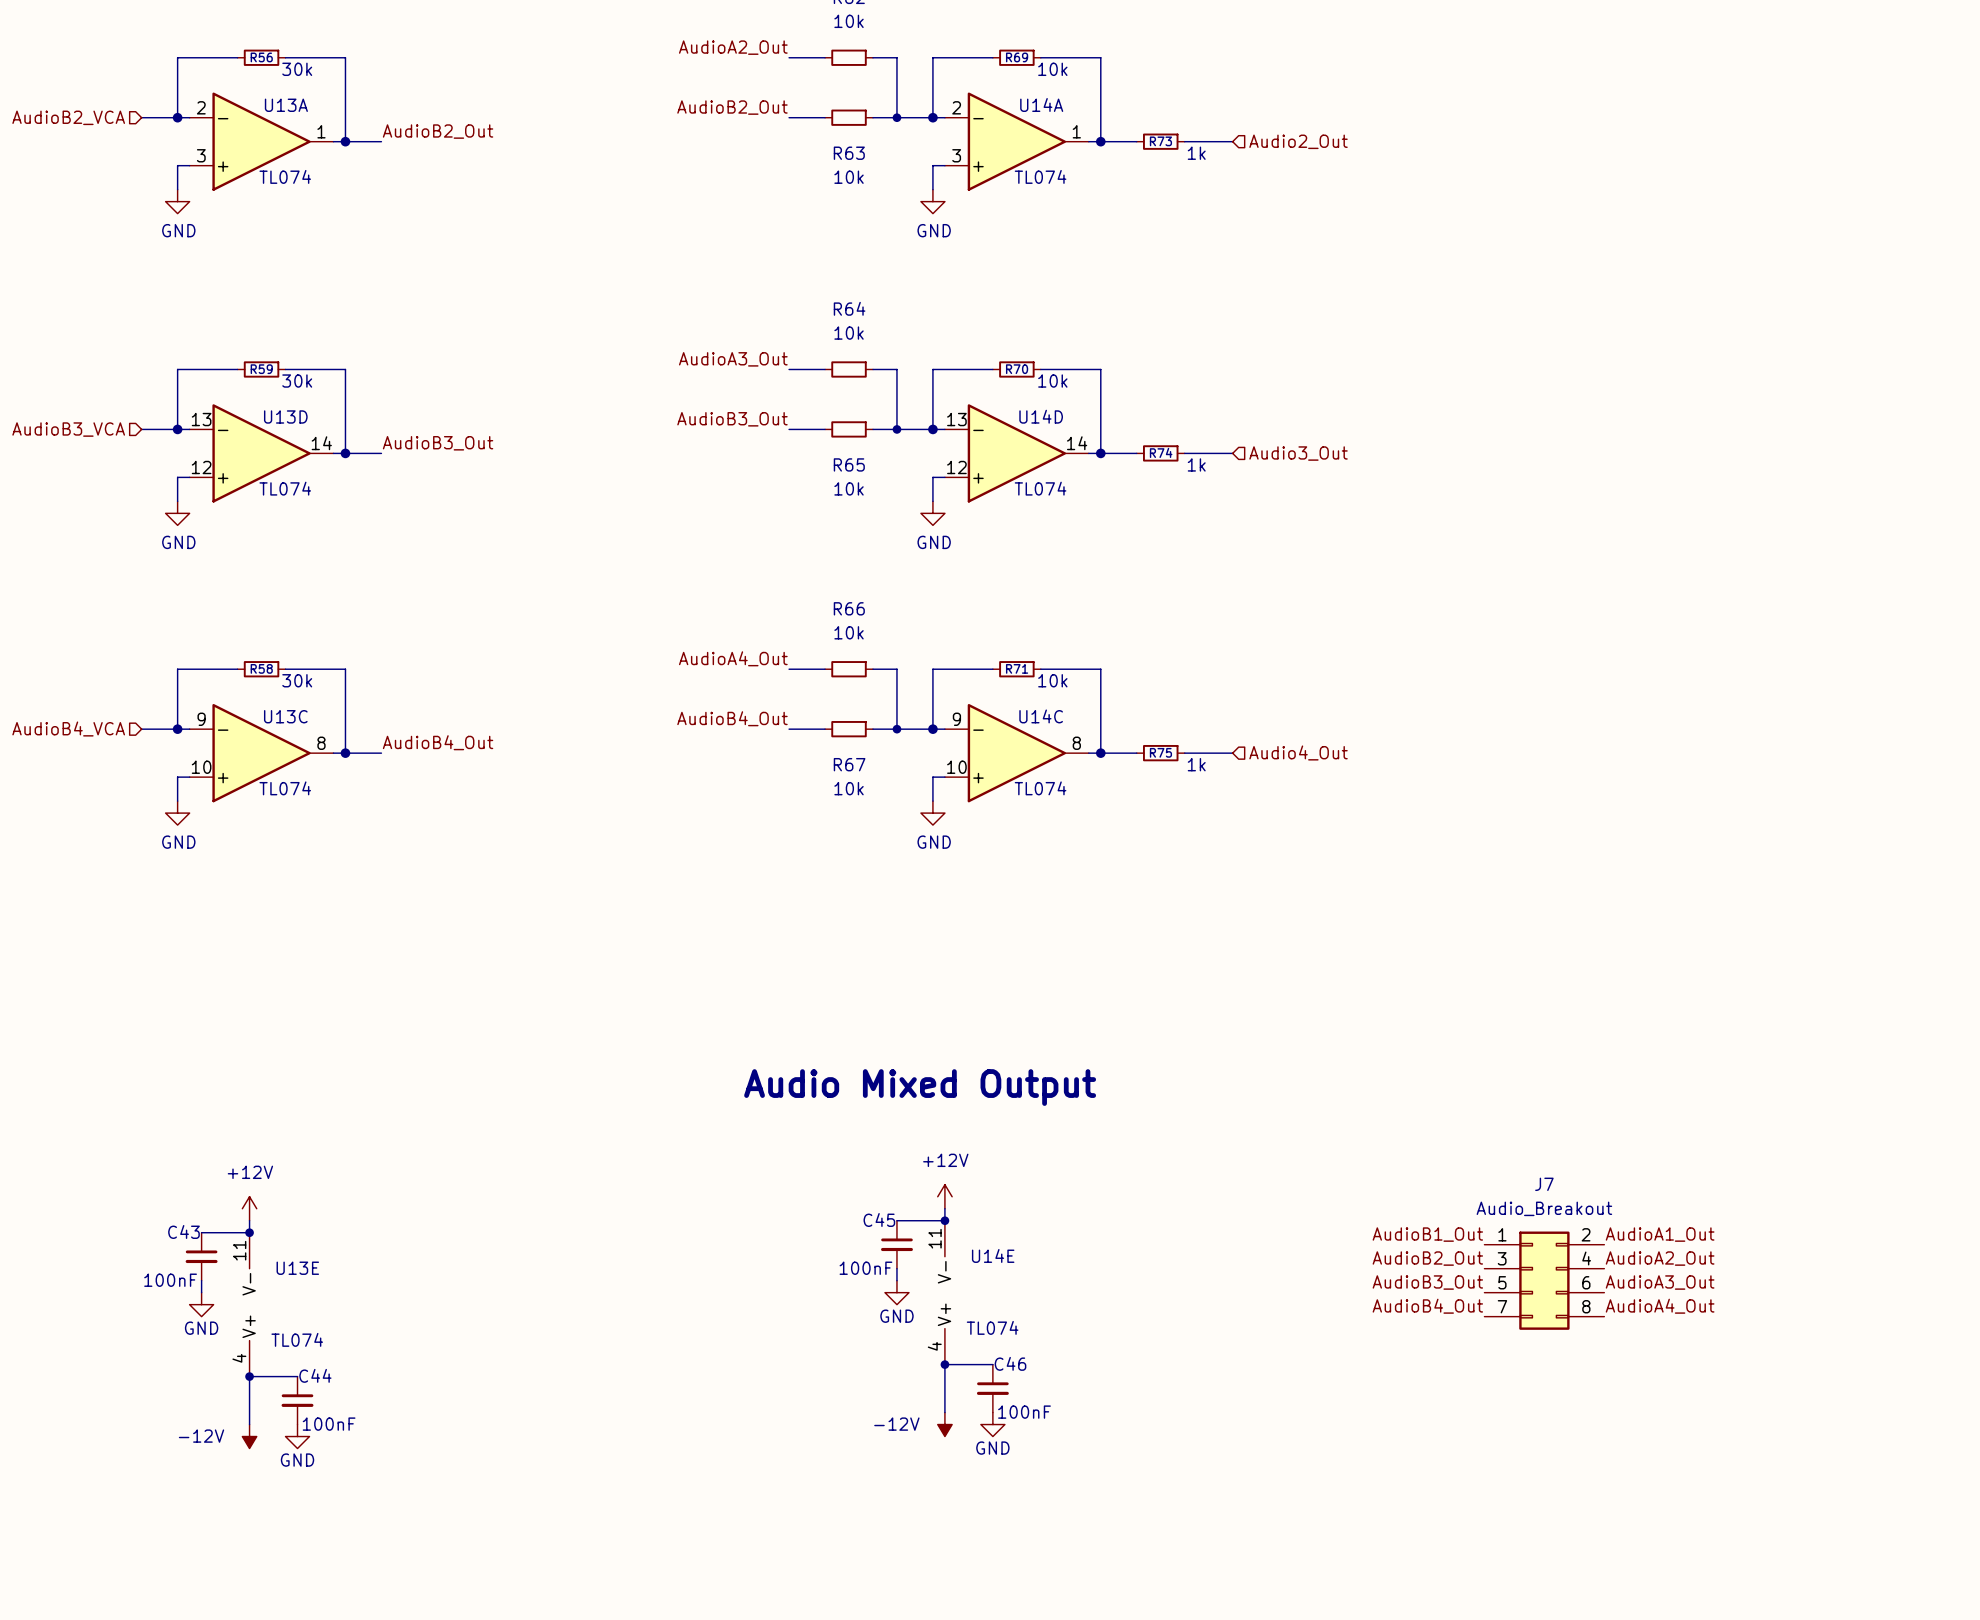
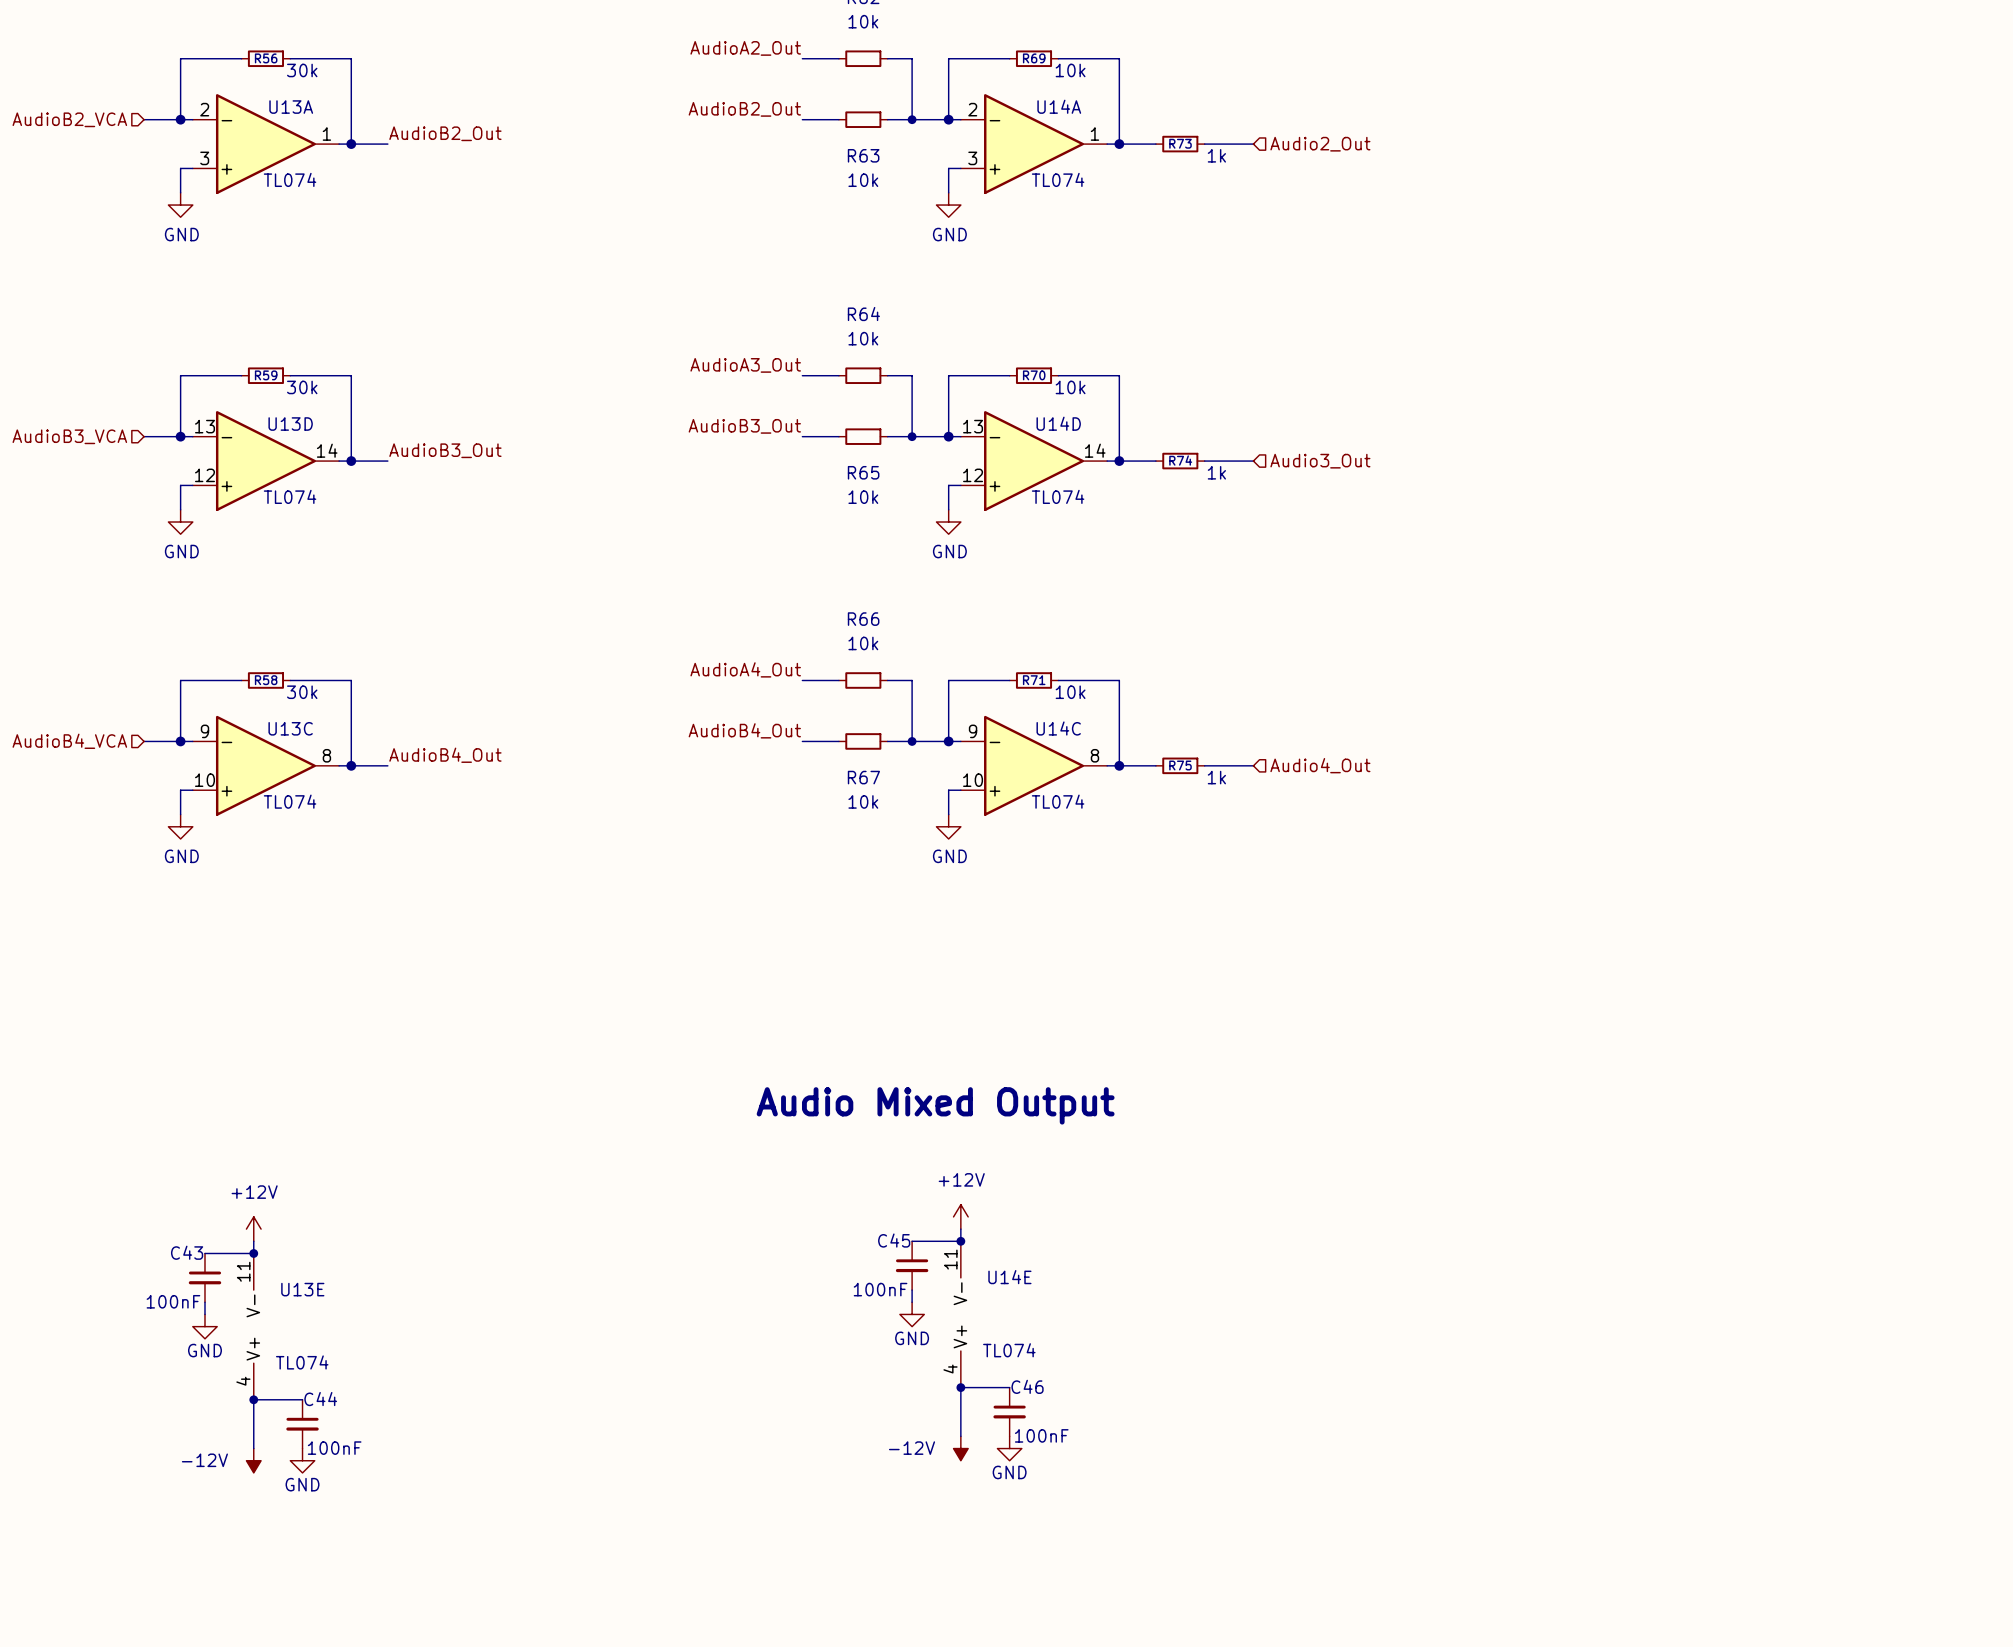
label: AudioB1_Out (1427, 1234) -> none
label: AudioA1_Out (1660, 1234) -> none
label: AudioB2_Out (1427, 1258) -> none
label: AudioA2_Out (1660, 1258) -> none
J7: Audio_Breakout (1544, 1280) -> none
label: AudioB3_Out (1427, 1282) -> none
label: AudioA3_Out (1660, 1282) -> none
label: AudioB4_Out (1427, 1306) -> none
label: AudioA4_Out (1660, 1306) -> none

